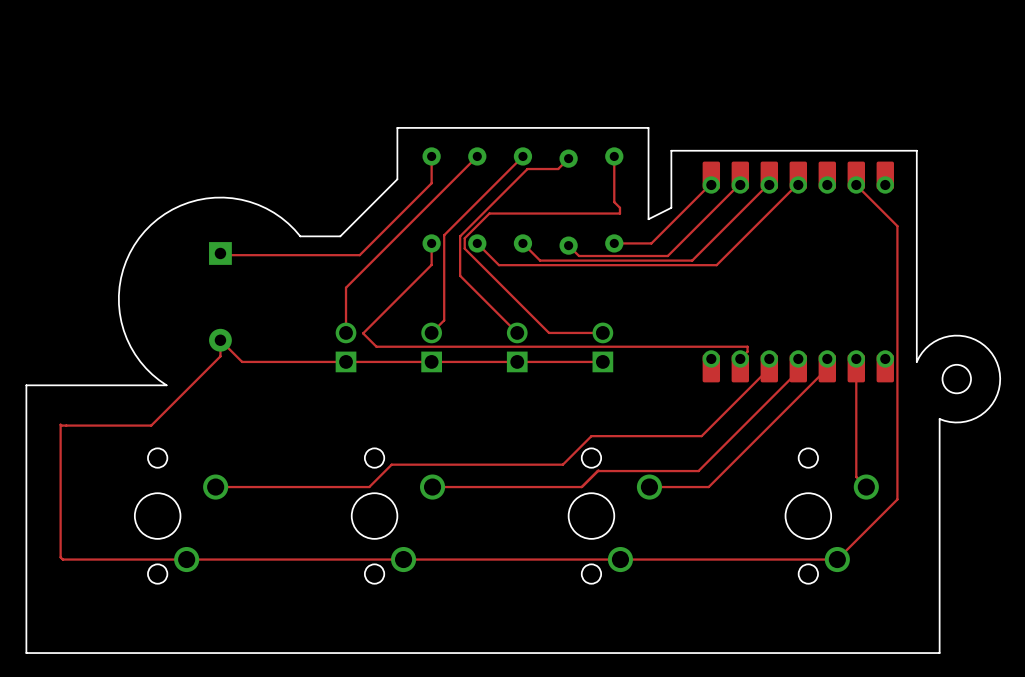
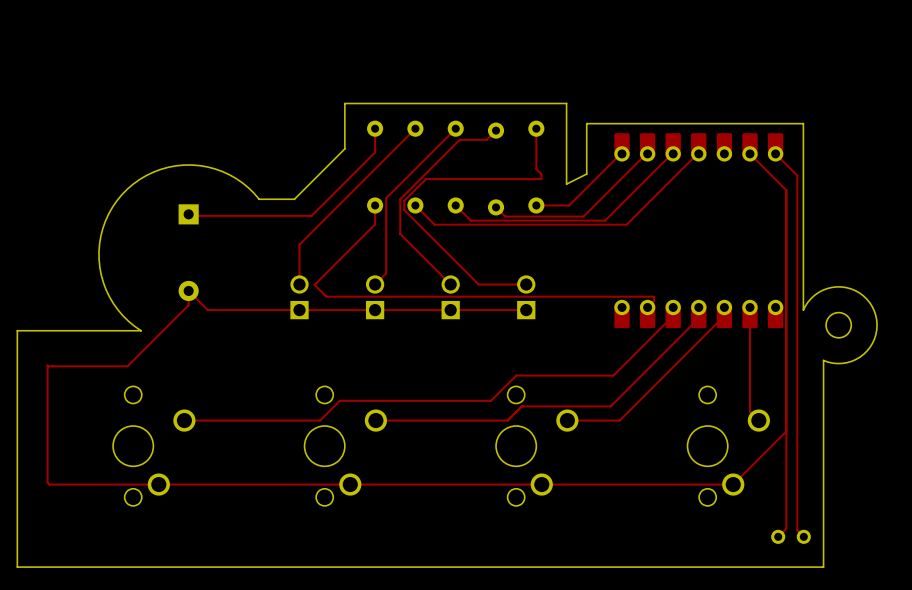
top track: none -> (775, 153) (797, 175) (797, 530) (803, 536)
top track: none -> (786, 431) (786, 528) (778, 536)
part: none -> (791, 536)

